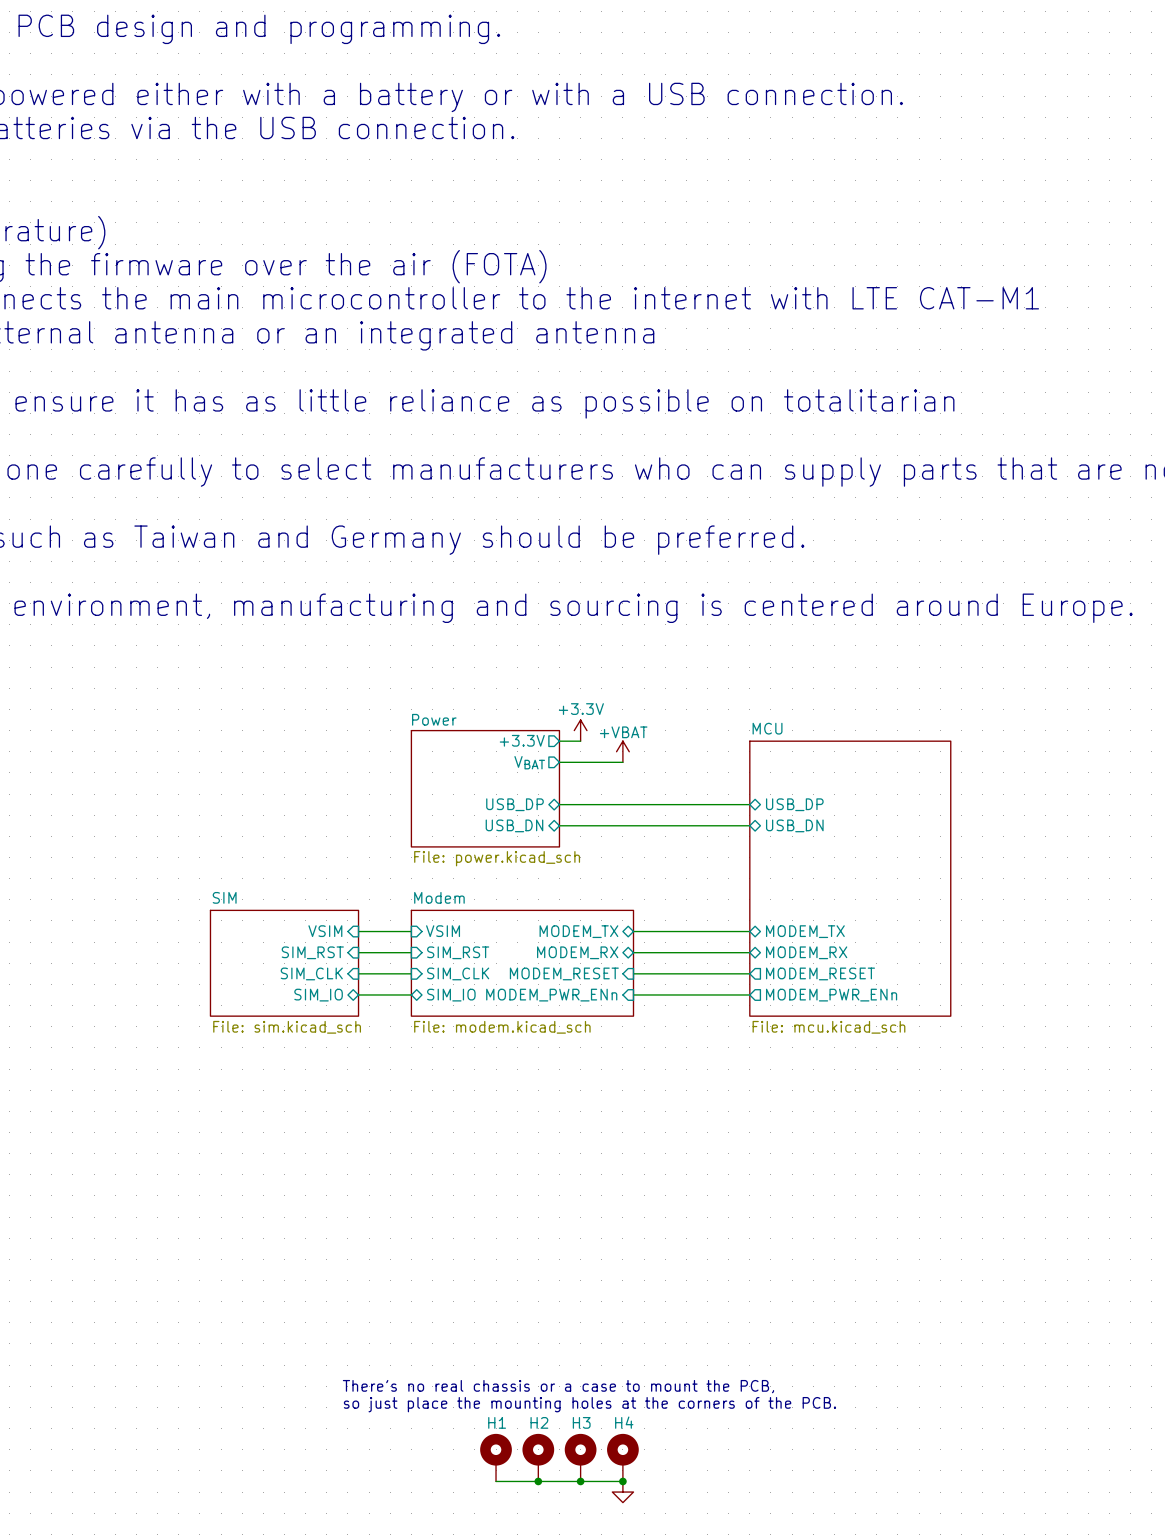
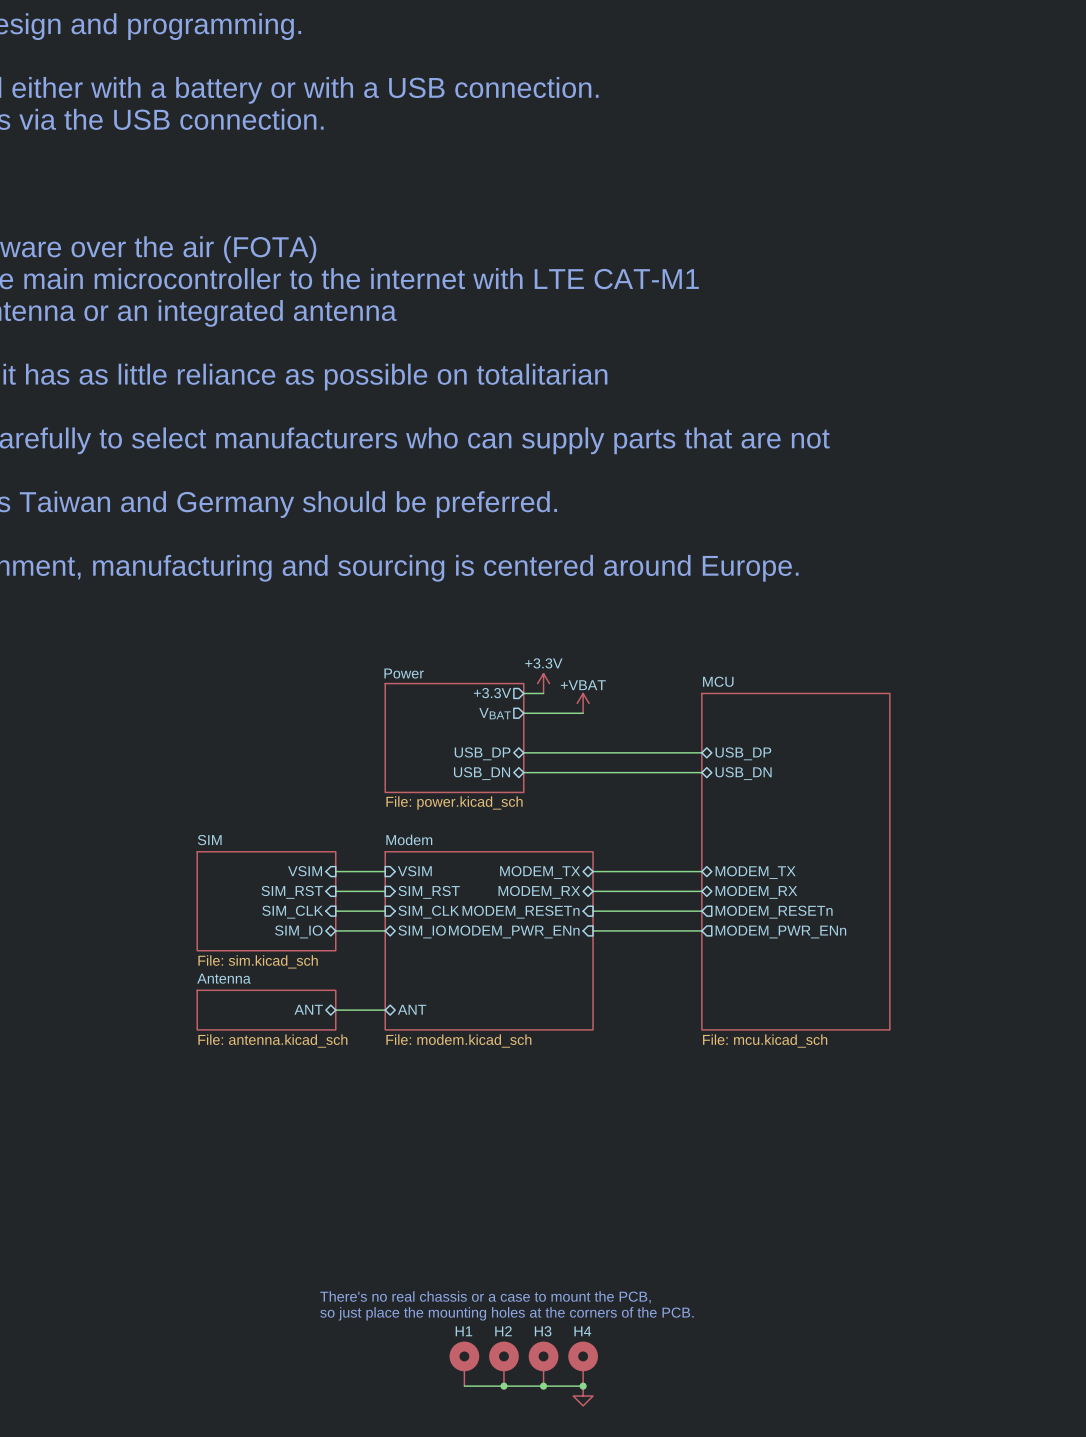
sheet MCU: File: mcu.kicad_sch (850, 878) -> none
sheet MCU: none -> File: mcu.kicad_sch (795, 861)
sheet Modem: File: modem.kicad_sch (522, 963) -> none
sheet pin: MODEM_RESET (564, 973) -> MODEM_RESETn (521, 912)
sheet pin: MODEM_RESET (820, 973) -> MODEM_RESETn (774, 912)
sheet Modem: none -> File: modem.kicad_sch (489, 940)
sheet Antenna: none -> File: antenna.kicad_sch (266, 1010)
sheet pin: none -> ANT (308, 1009)
wire: none -> (335, 1010) (385, 1010)
sheet pin: none -> ANT (412, 1009)

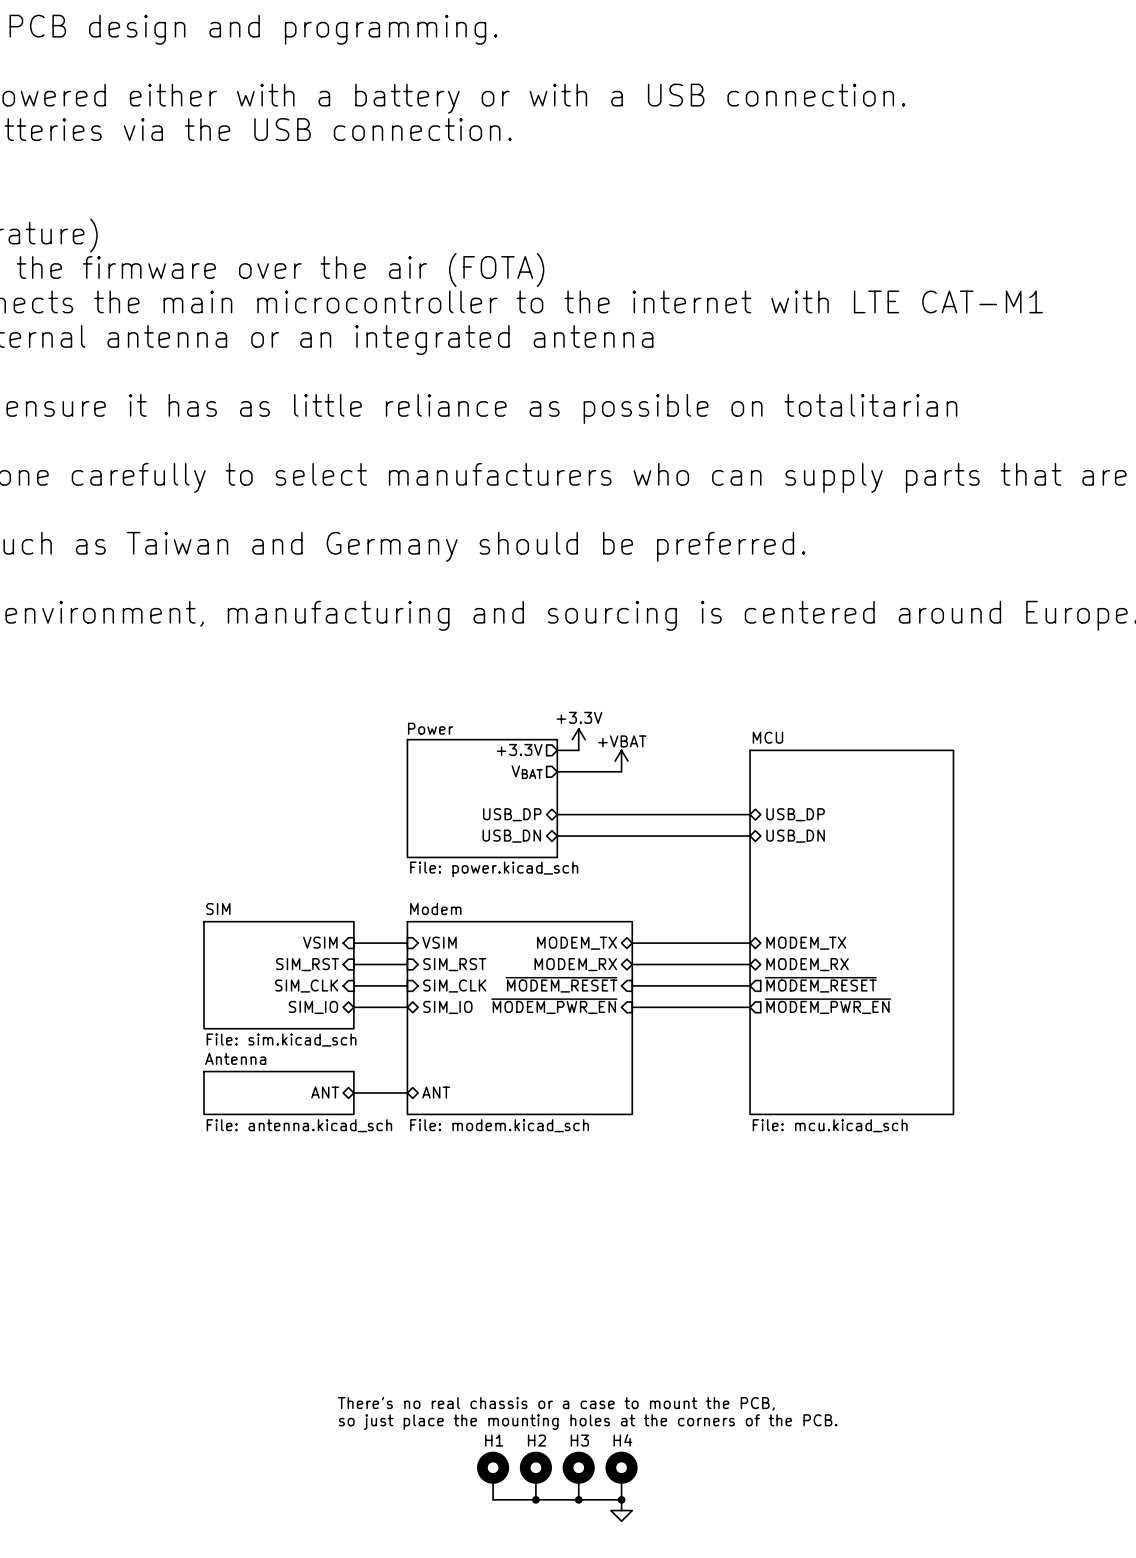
sheet pin: MODEM_RESETn (521, 912) -> ~{MODEM_RESET} (561, 984)
sheet pin: MODEM_RESETn (774, 912) -> ~{MODEM_RESET} (820, 984)
sheet pin: MODEM_PWR_ENn (514, 931) -> ~{MODEM_PWR_EN} (554, 1006)
sheet pin: MODEM_PWR_ENn (780, 931) -> ~{MODEM_PWR_EN} (827, 1006)

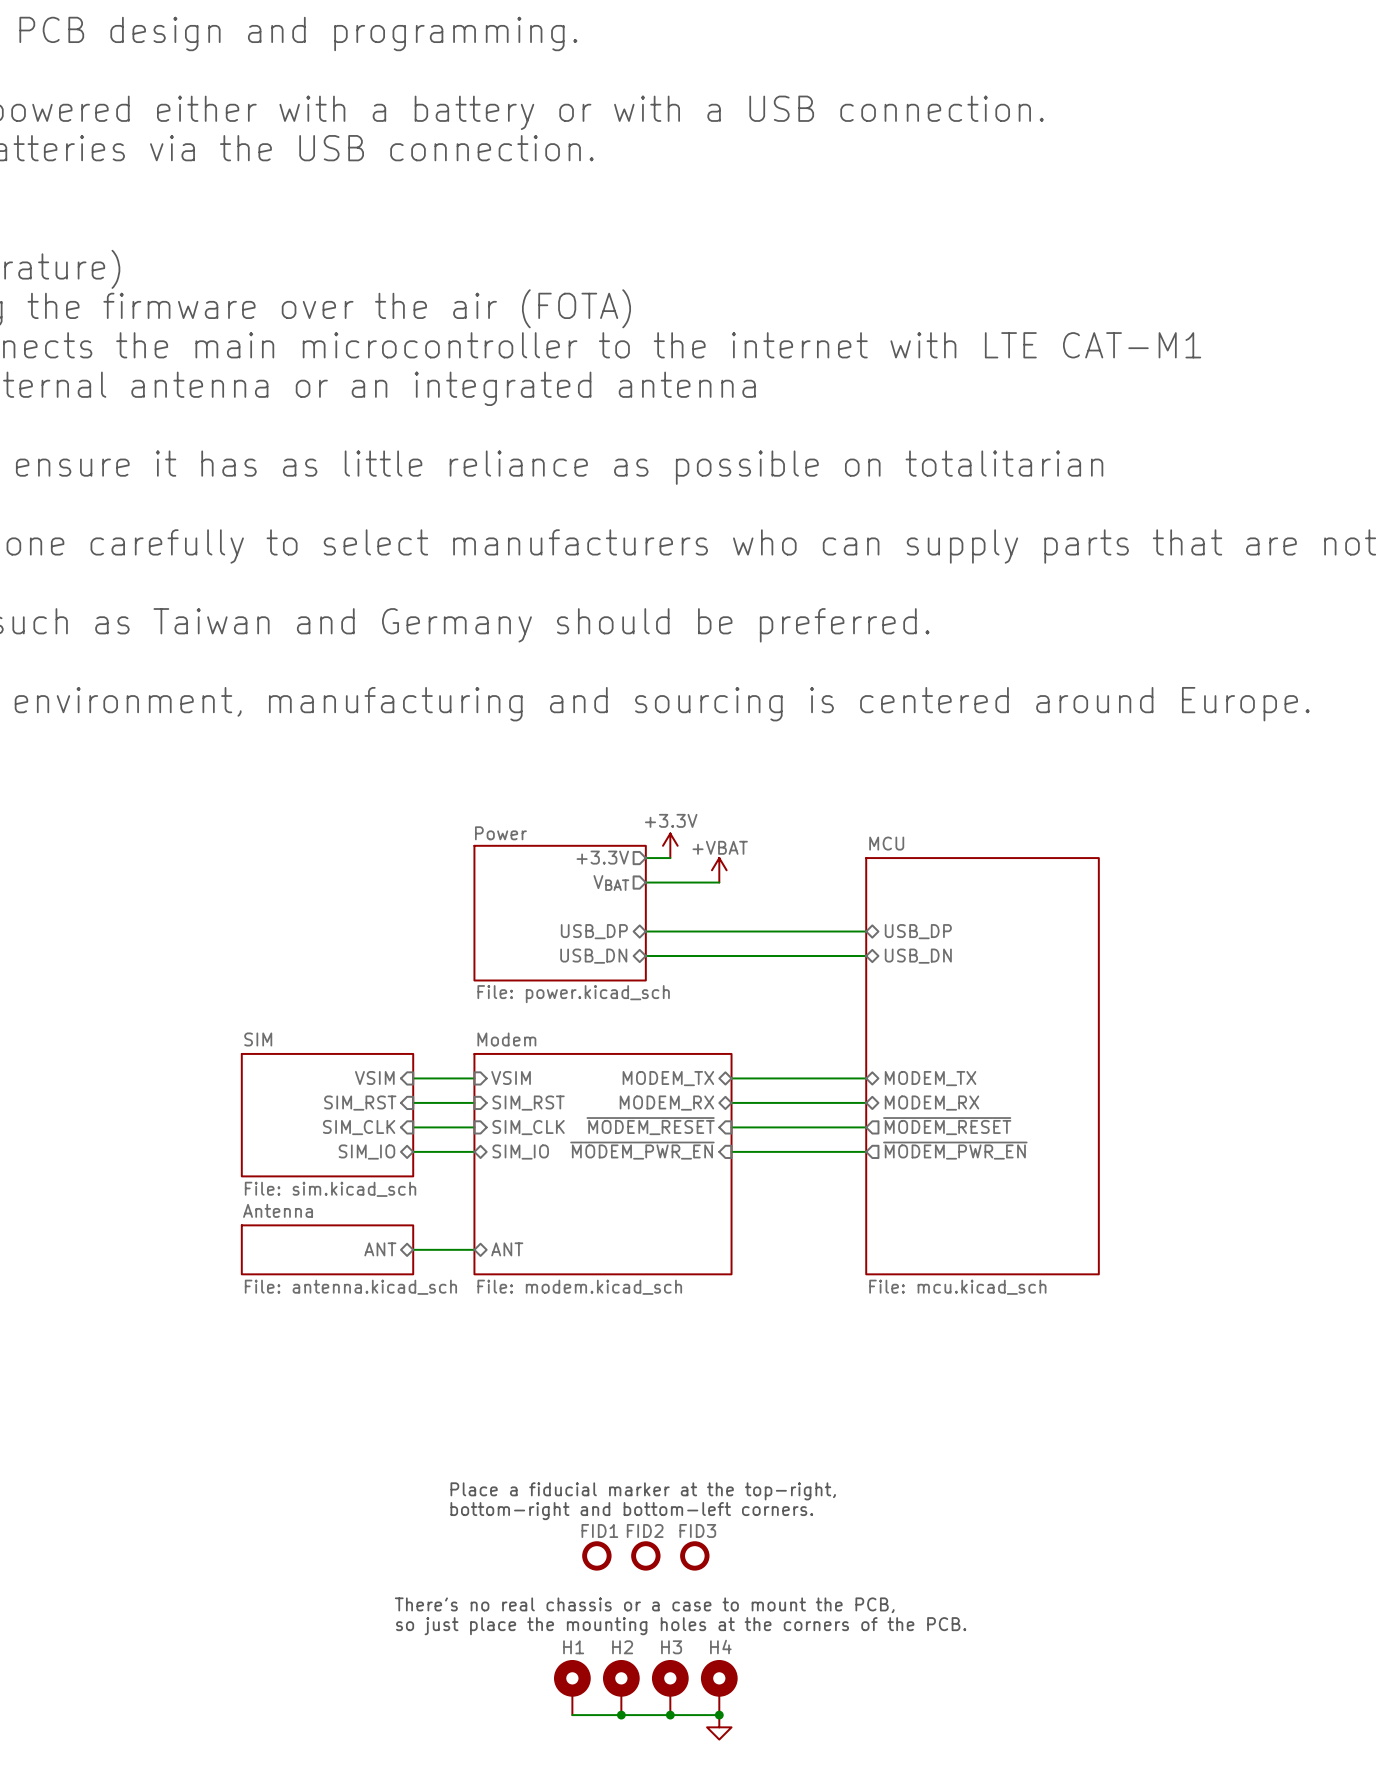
text: none -> Place a fiducial marker at the top-right, (643, 1491)
text: none -> bottom-right and bottom-left corners. (631, 1511)
FID1: none -> (596, 1555)
FID2: none -> (645, 1555)
FID3: none -> (694, 1555)

